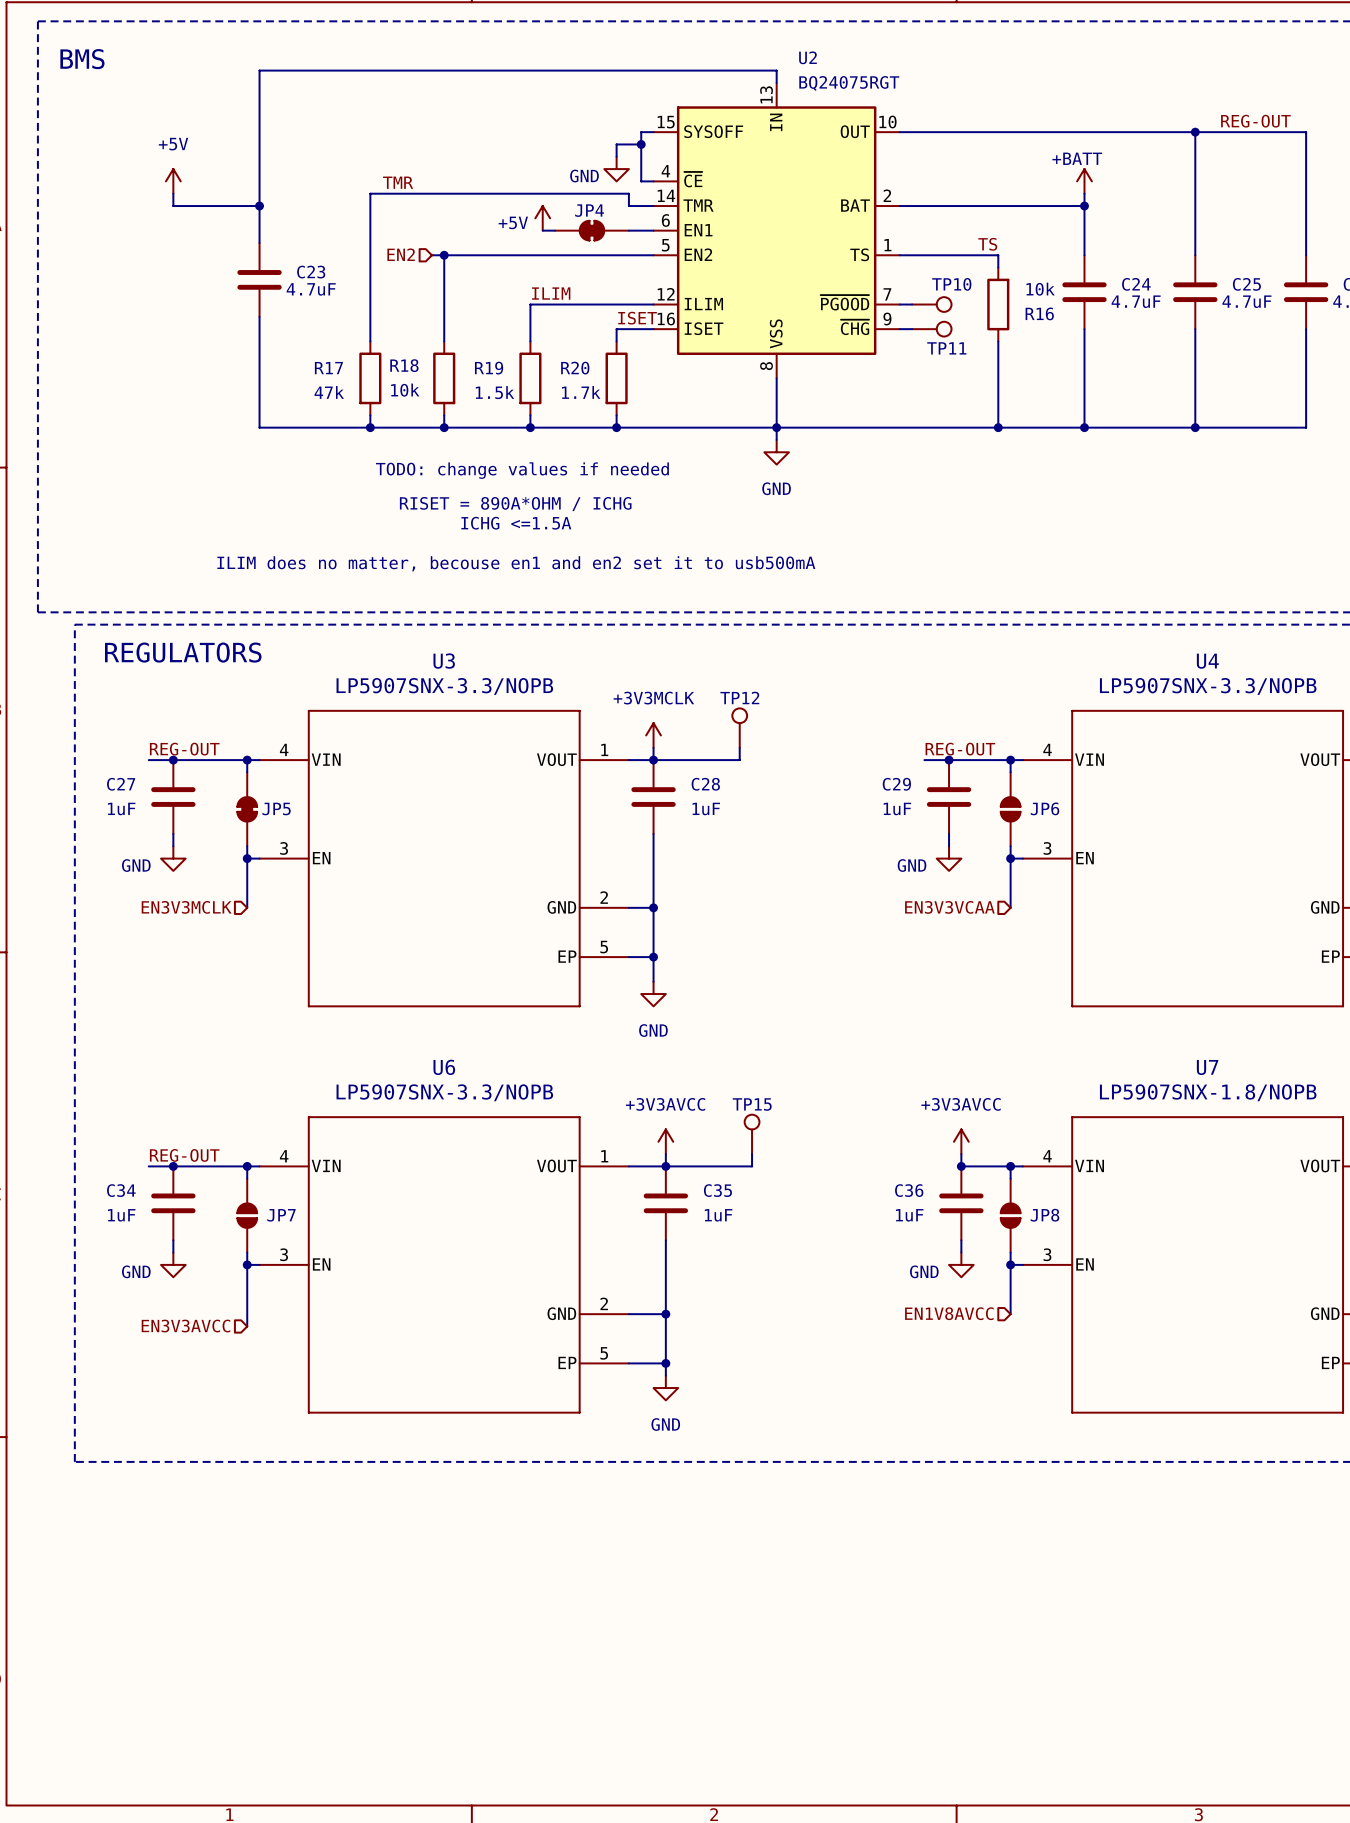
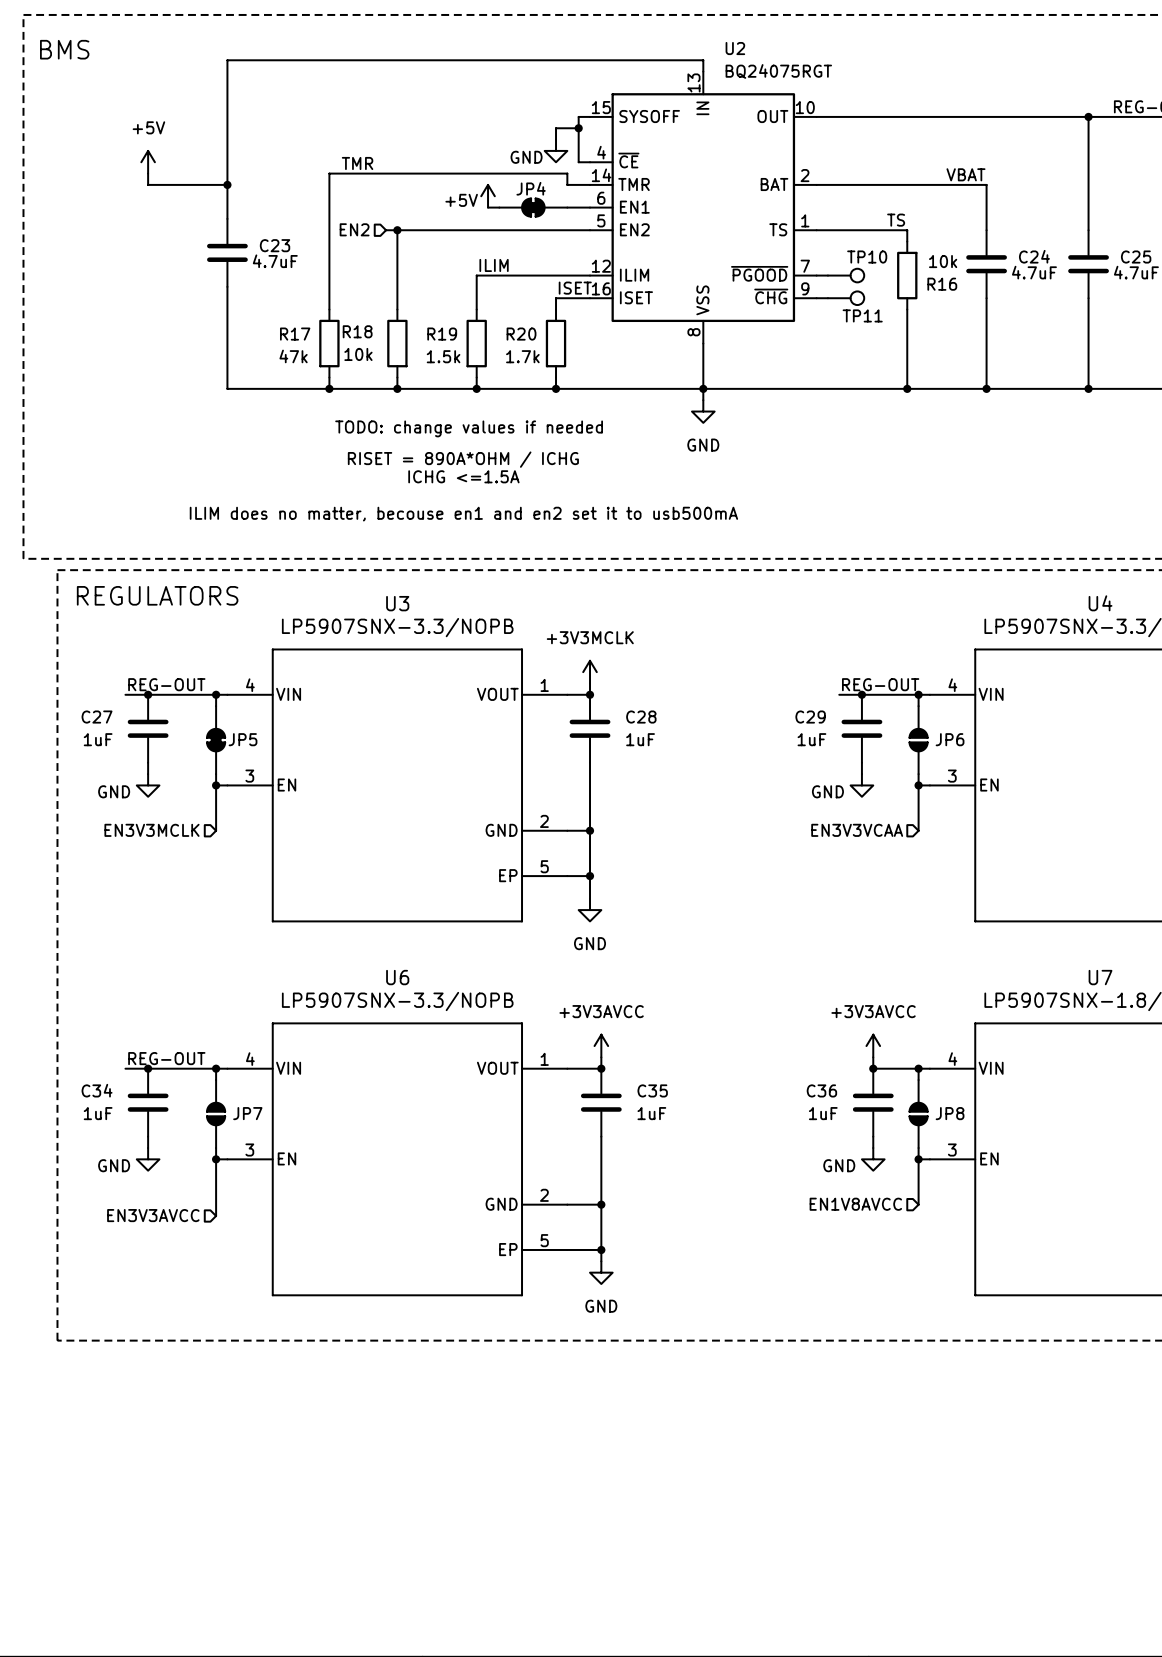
power symbol: +BATT (1084, 181) -> none
wire: (1084, 193) (1084, 206) -> none
label: none -> VBAT (965, 174)
junction: (1084, 206) -> none
TP12: (739, 728) -> none
wire: (739, 747) (739, 760) (653, 760) -> none
TP15: (752, 1134) -> none
wire: (752, 1154) (752, 1166) (665, 1166) -> none

